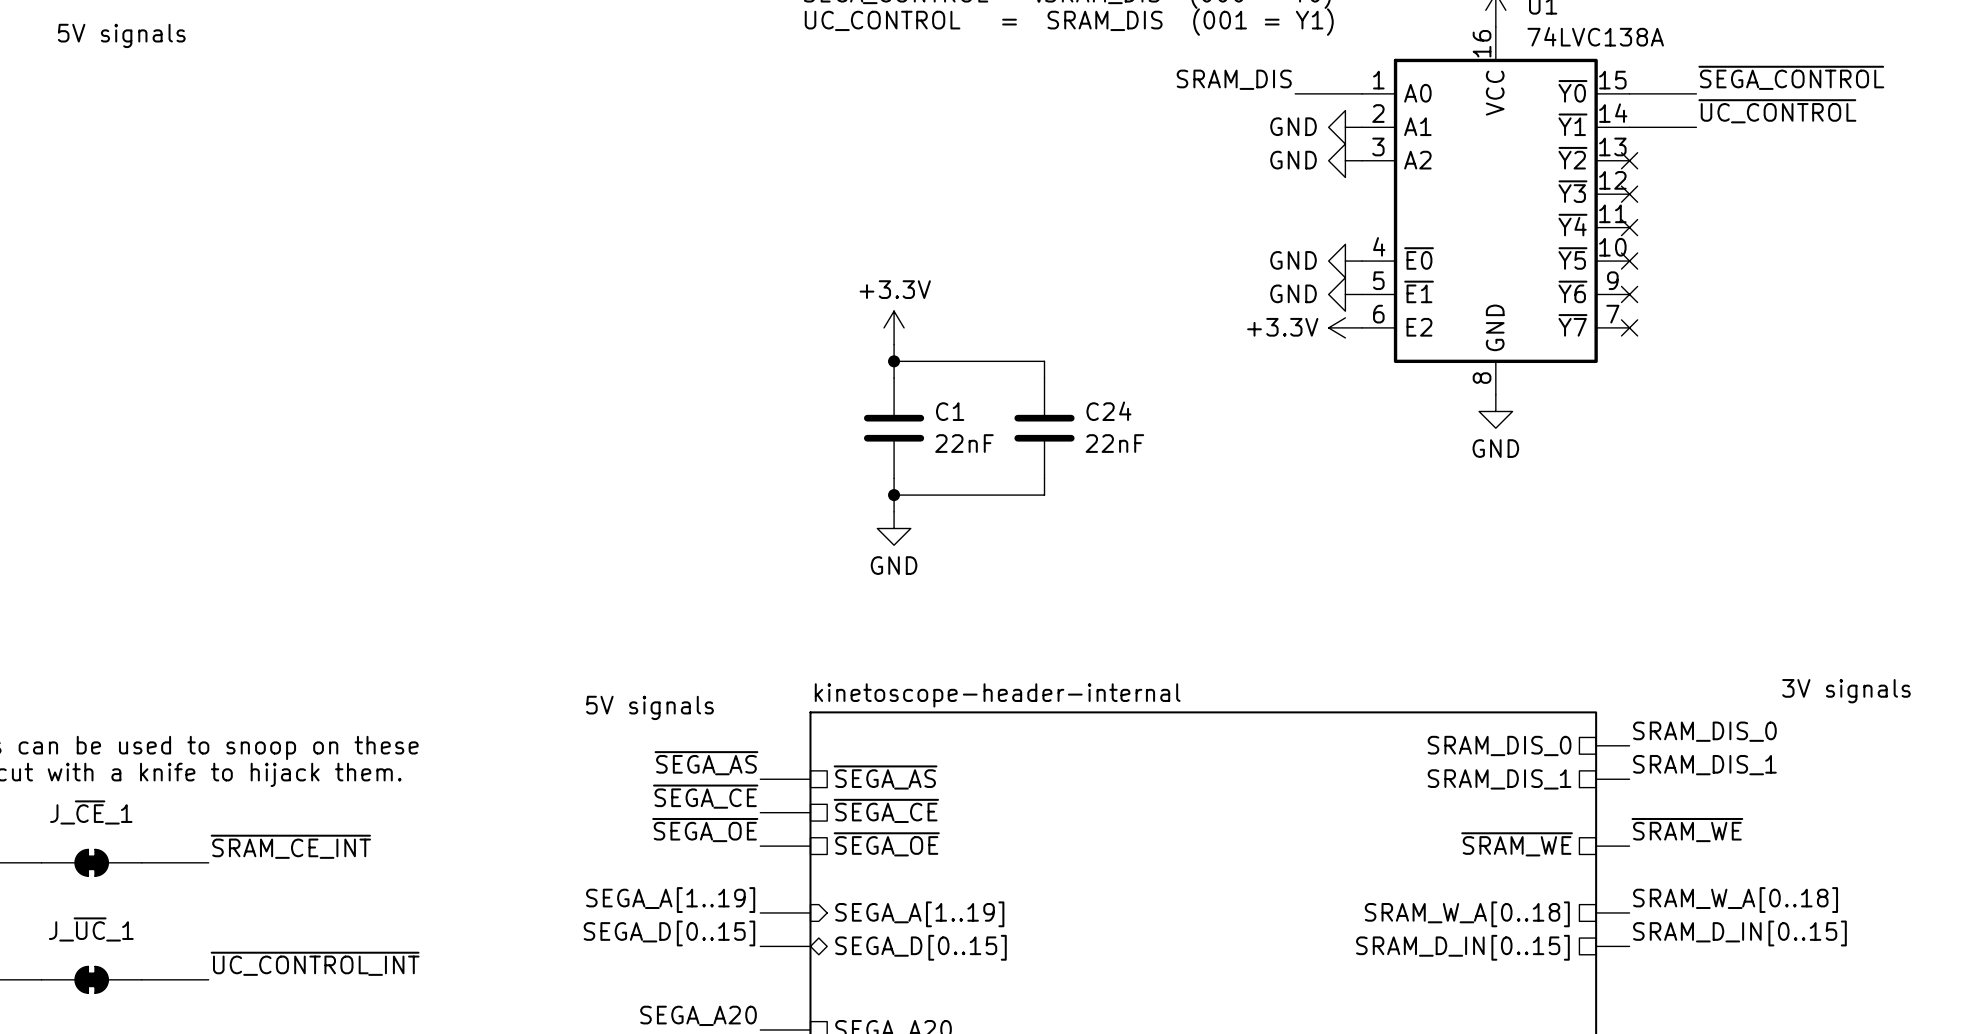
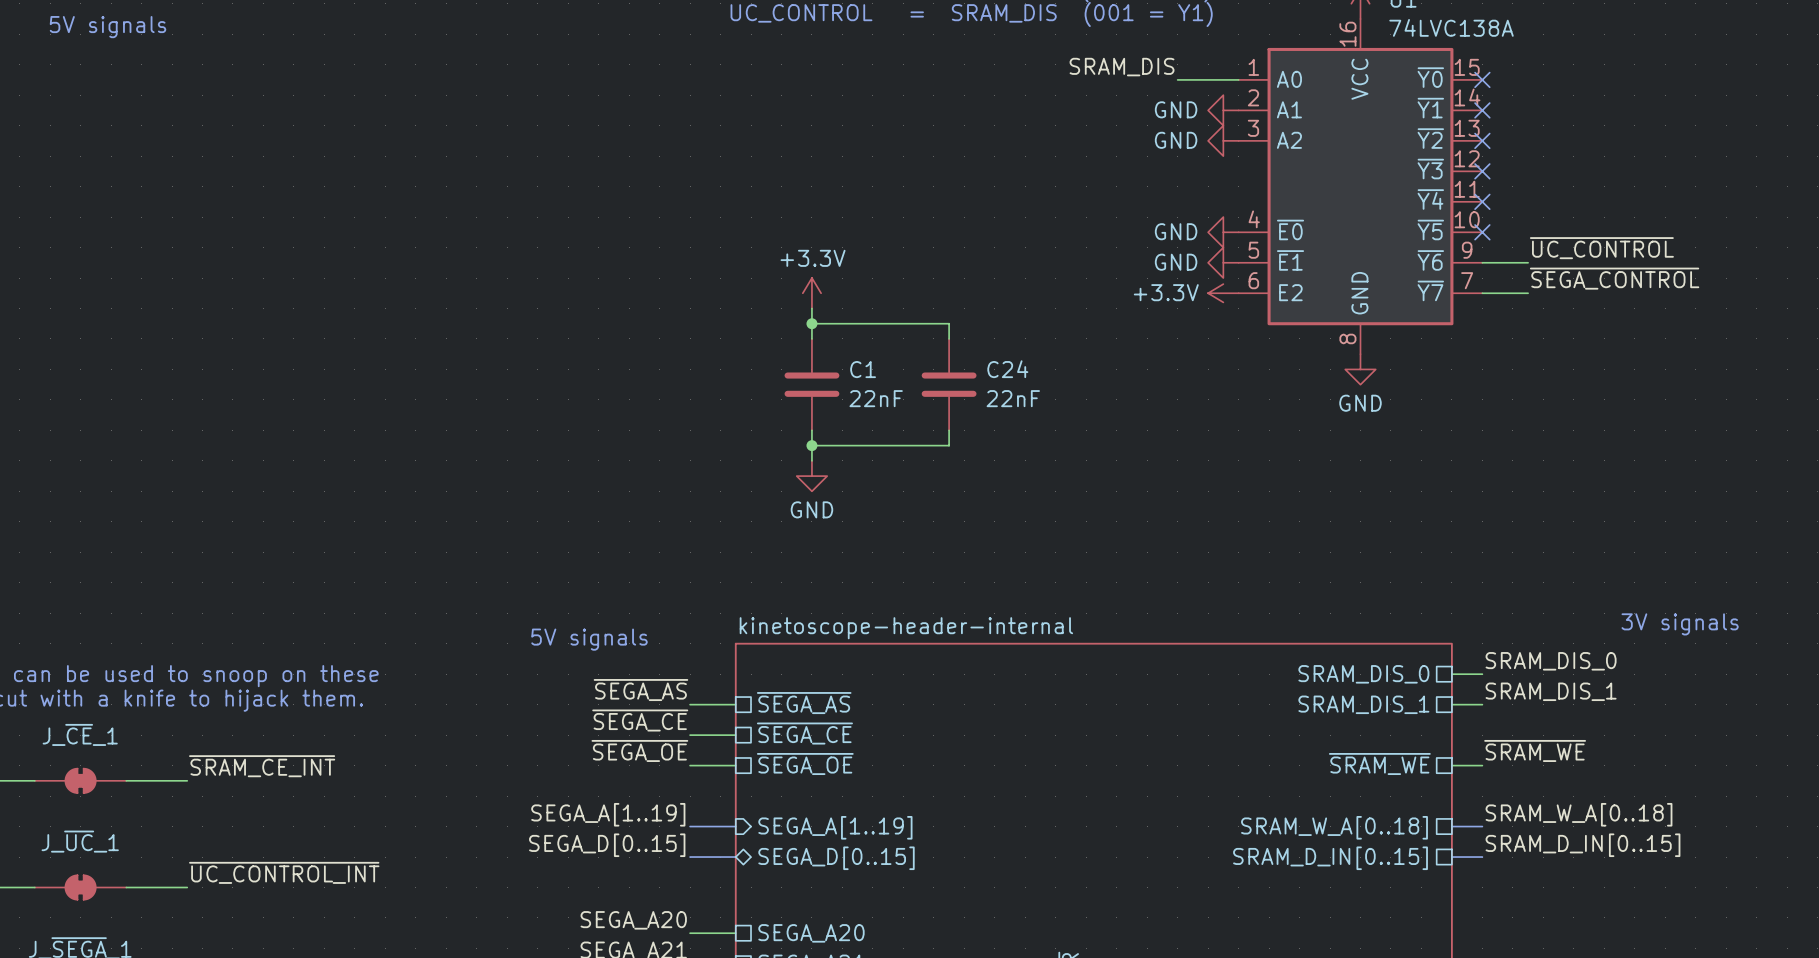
label position: ~{SEGA_CONTROL} (1791, 77) -> ~{SEGA_CONTROL} (1614, 278)
wire: (1629, 93) (1696, 93) -> none
no-connect mark: none -> (1482, 79)
label position: ~{UC_CONTROL} (1777, 111) -> ~{UC_CONTROL} (1601, 248)
wire: (1629, 127) (1696, 127) -> none
no-connect mark: none -> (1482, 110)
wire: none -> (1482, 262) (1528, 262)
no-connect mark: (1629, 294) -> none
wire: none -> (1482, 293) (1528, 293)
no-connect mark: (1629, 327) -> none

